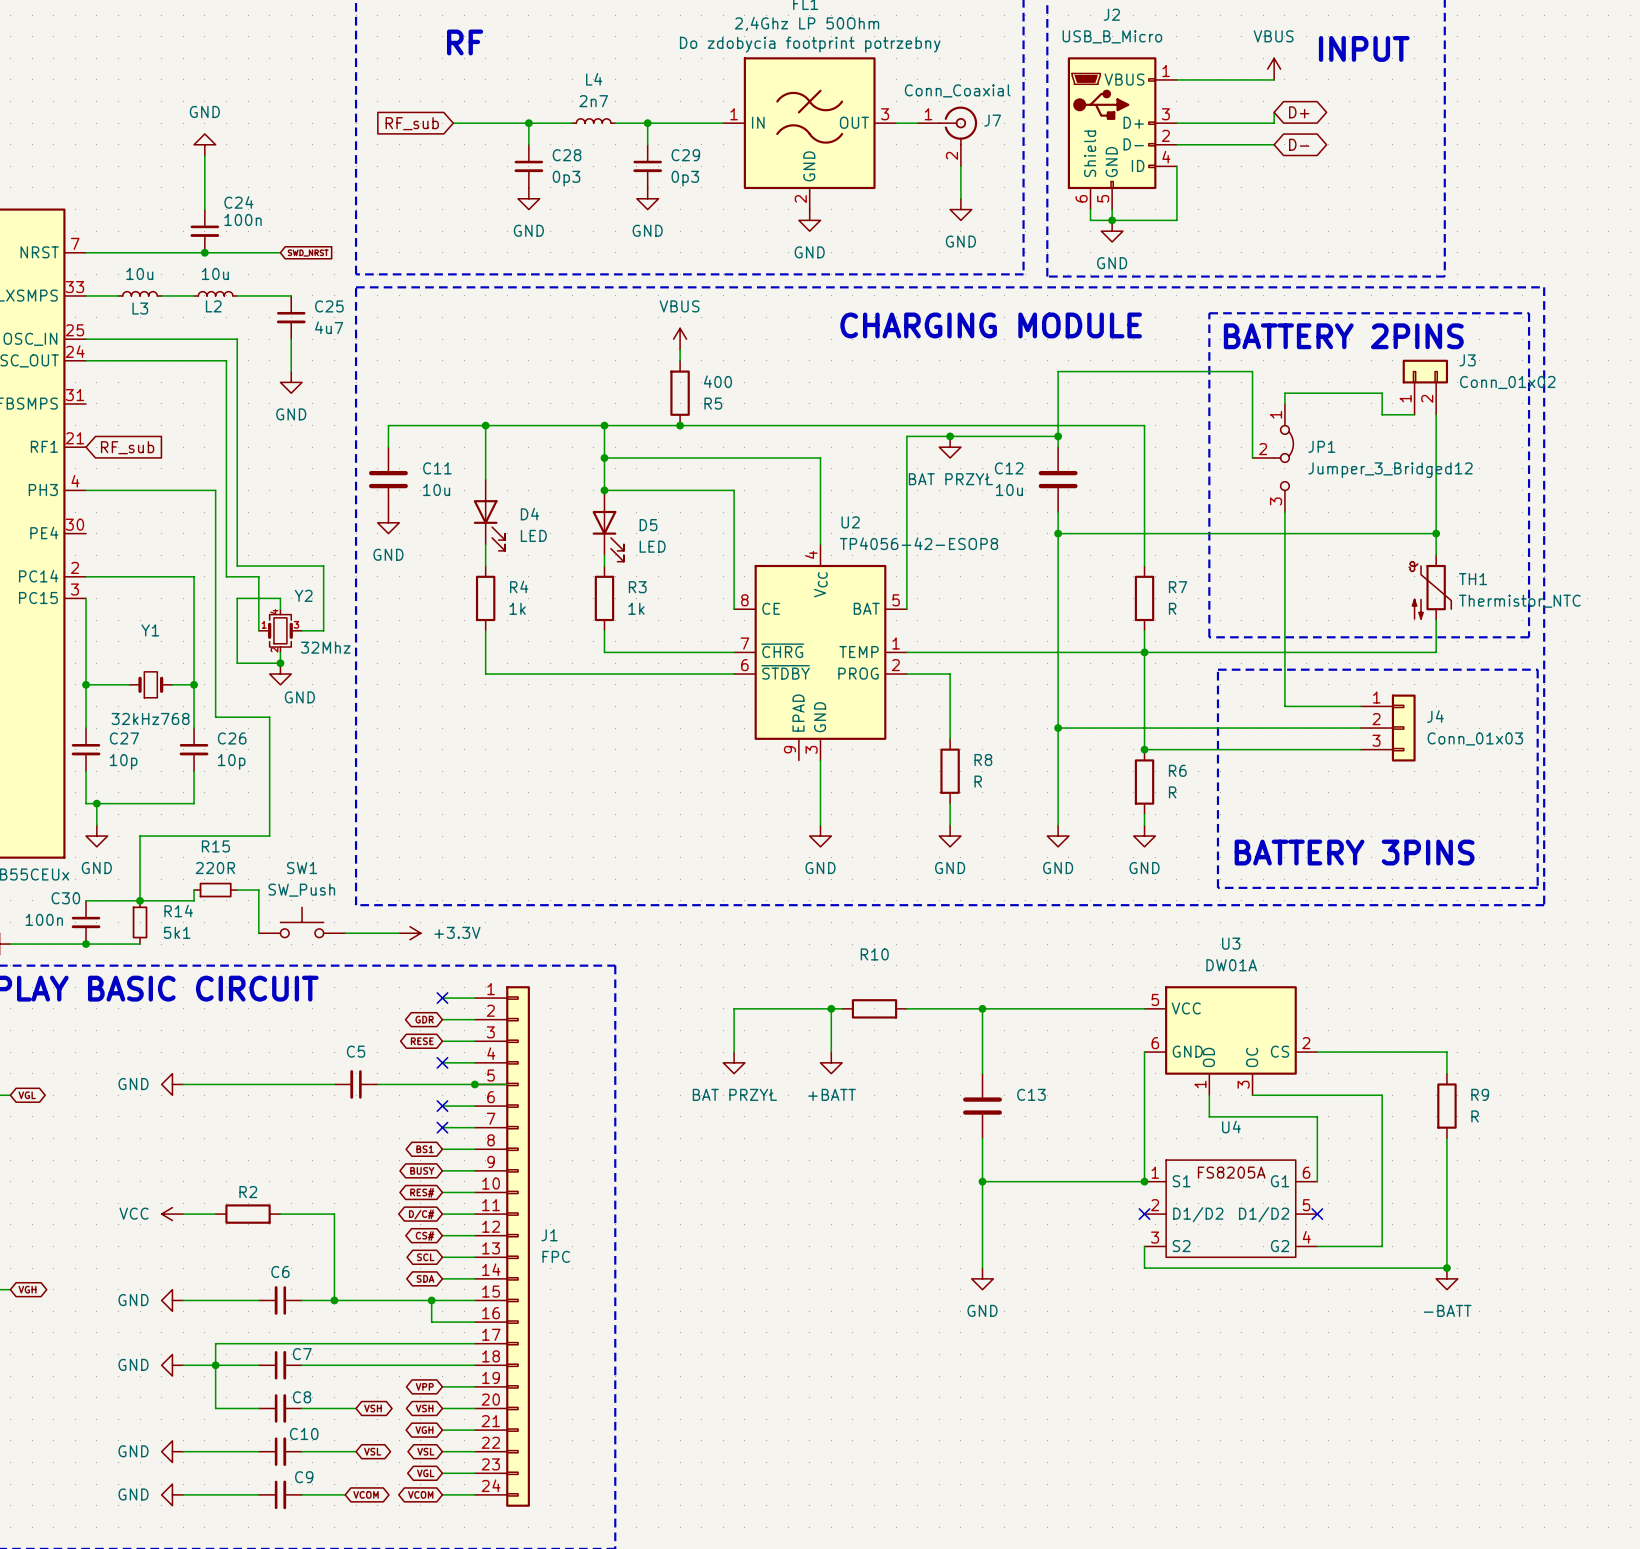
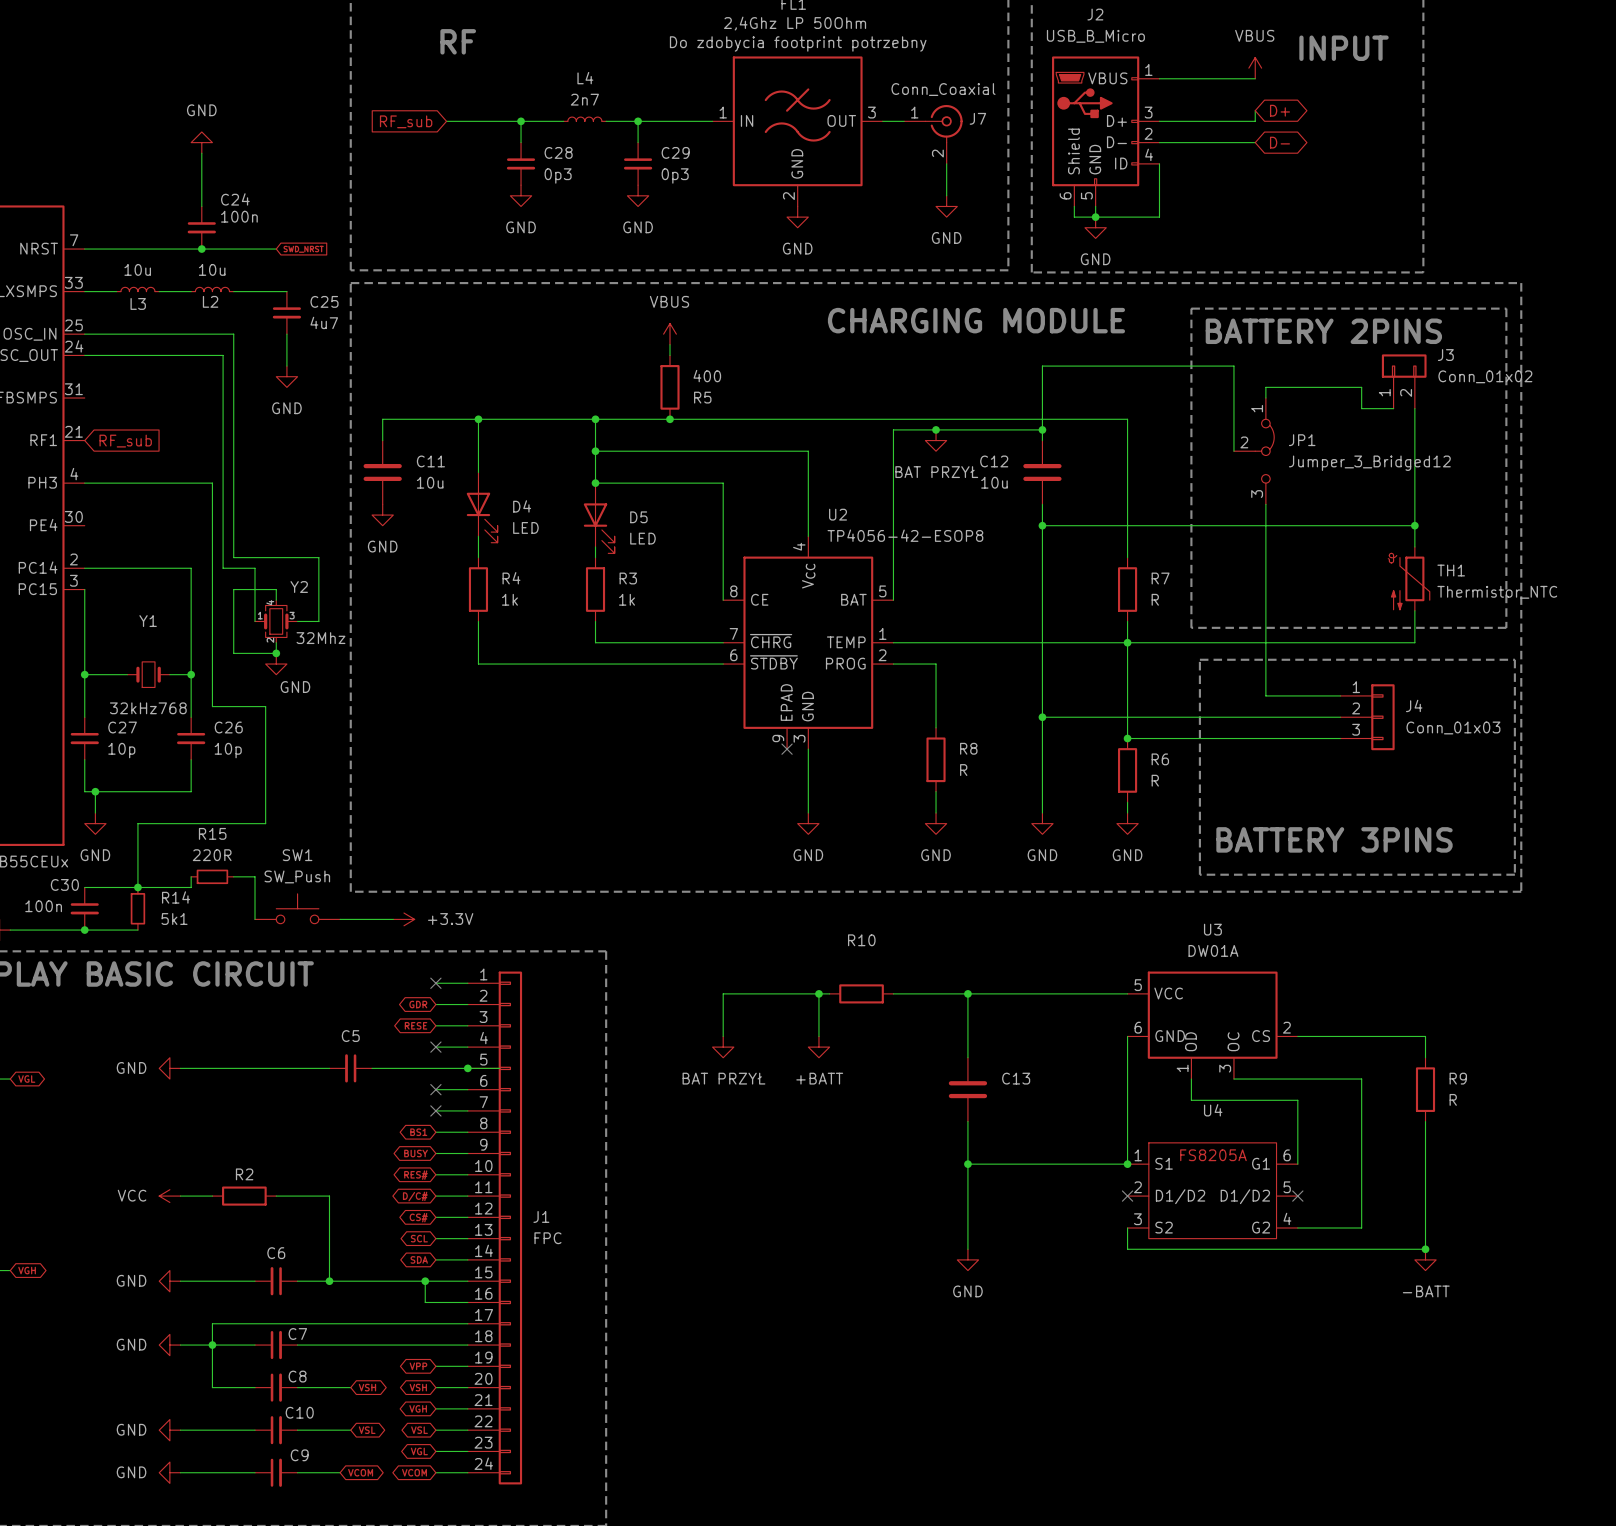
no-connect mark: none -> (787, 749)

